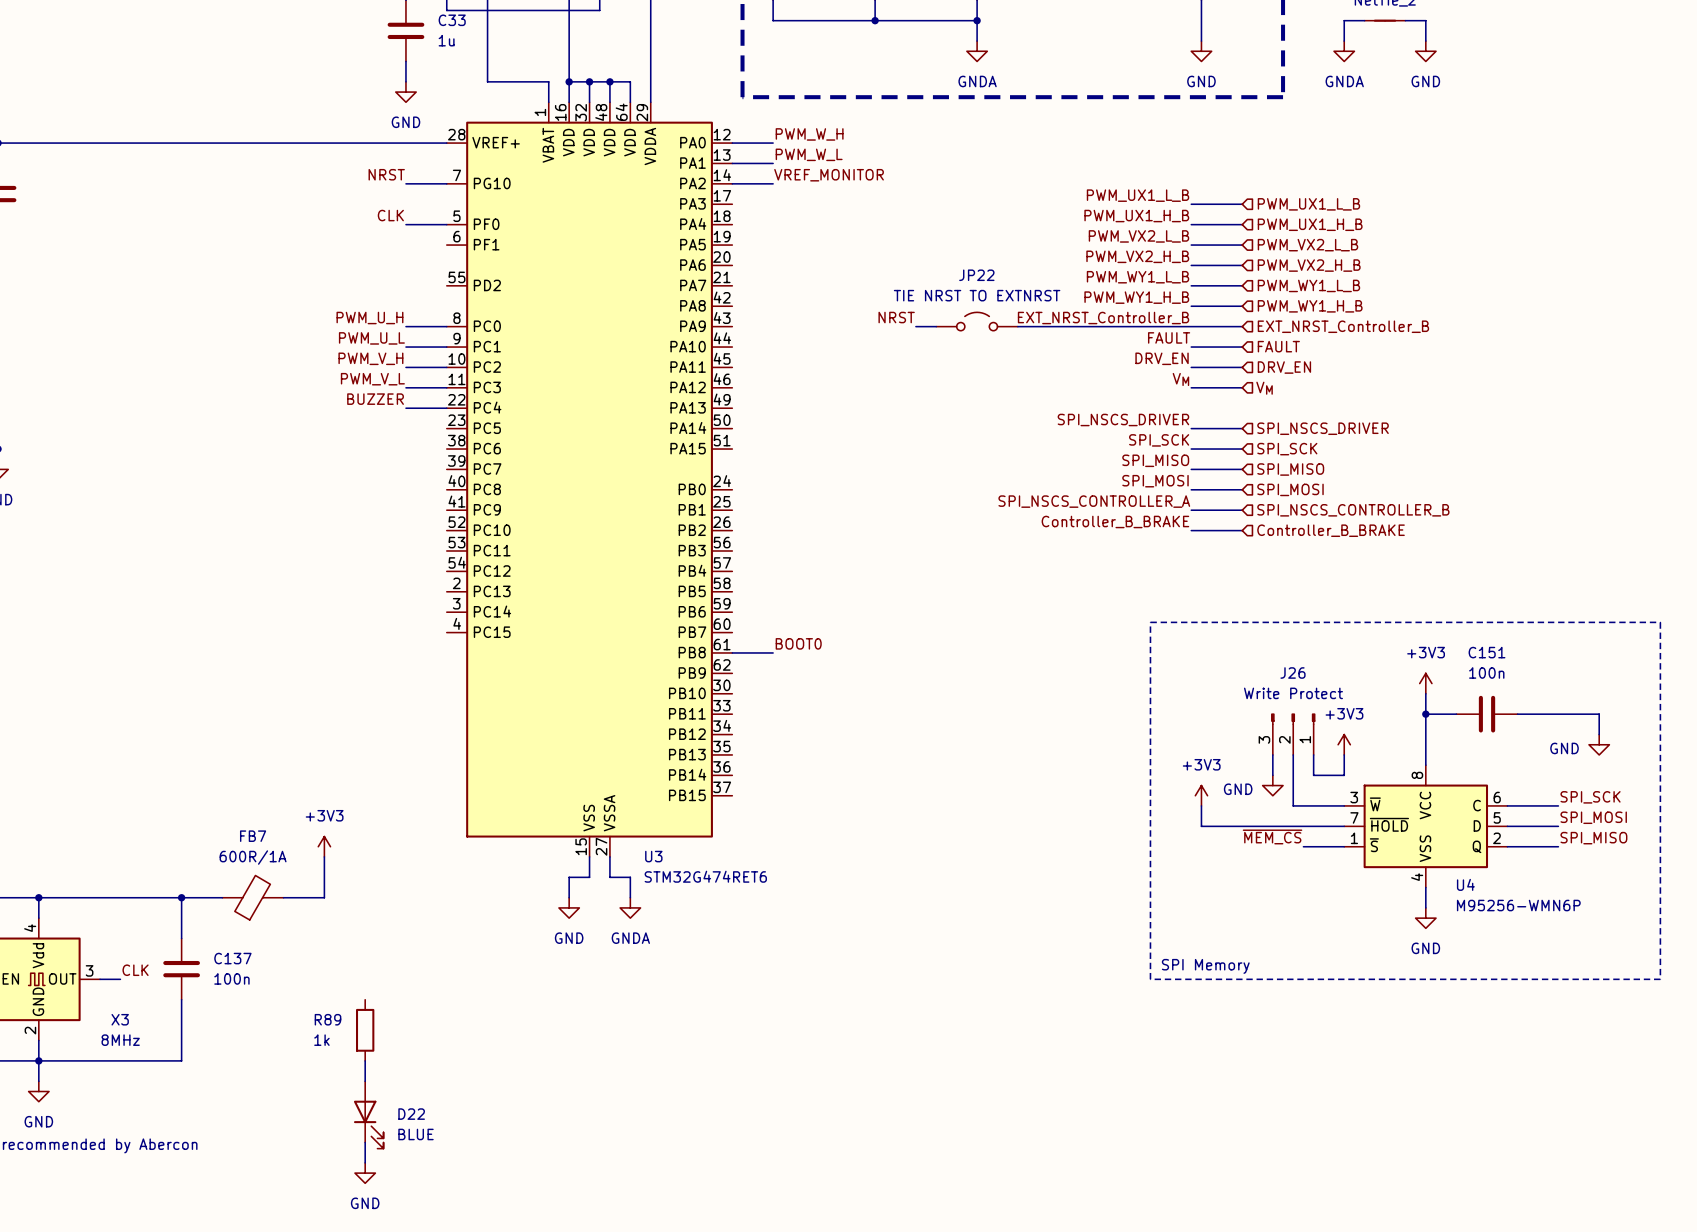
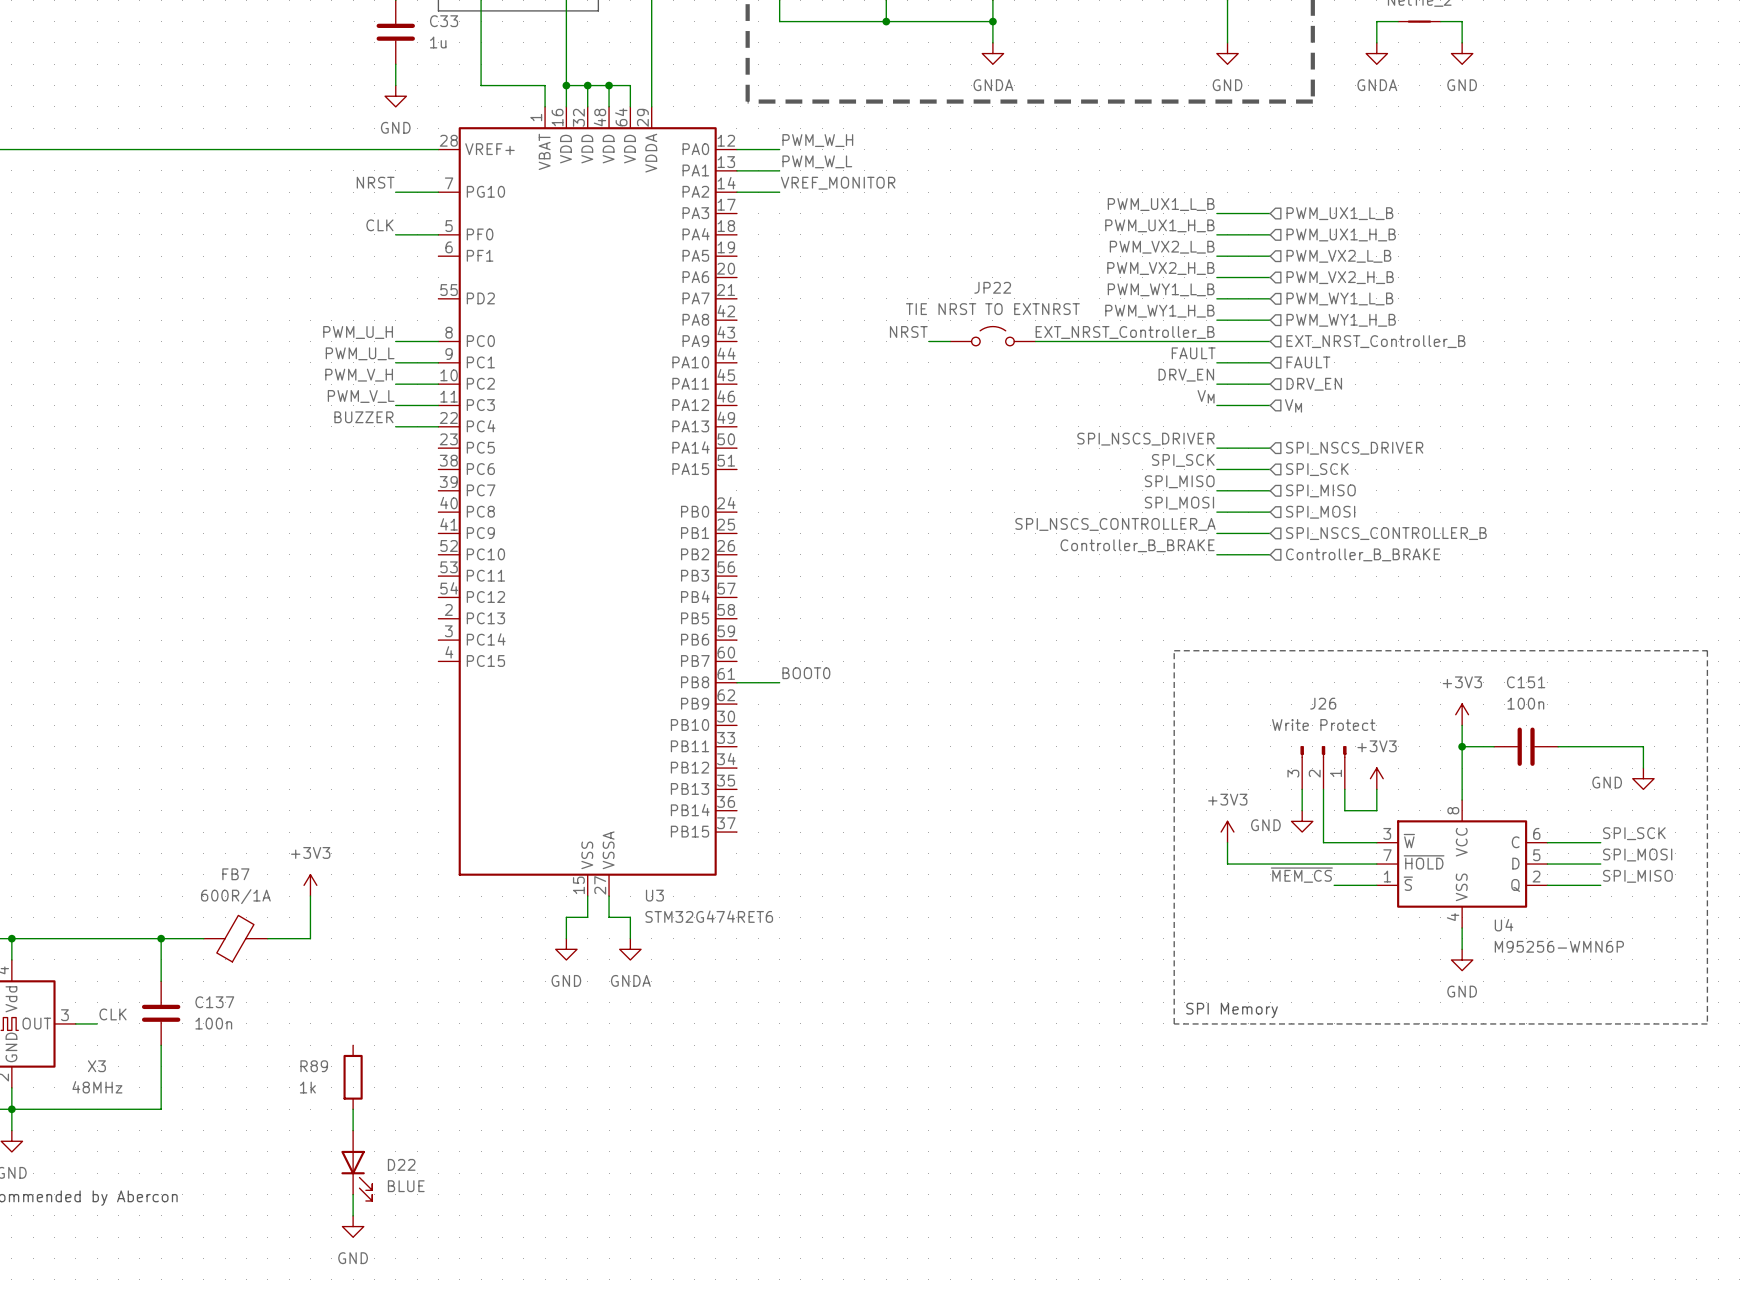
X3 value: 8MHz (120, 1040) -> 48MHz (97, 1087)

